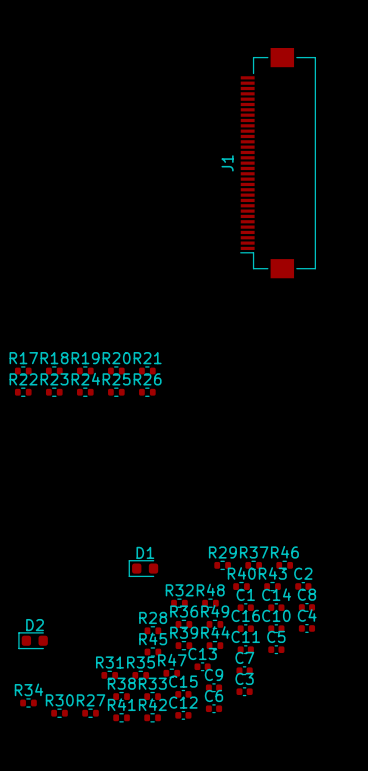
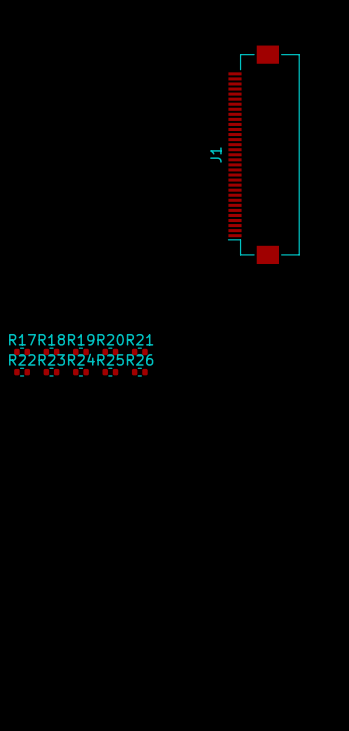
R29: (222, 565) -> none
R37: (253, 565) -> none
R46: (284, 565) -> none
D1: (143, 568) -> none
R40: (241, 586) -> none
R43: (272, 586) -> none
C2: (303, 586) -> none
R32: (179, 603) -> none
R48: (210, 603) -> none
C1: (245, 607) -> none
C14: (276, 607) -> none
C8: (306, 607) -> none
R36: (183, 624) -> none
R49: (214, 624) -> none
C16: (245, 628) -> none
C10: (276, 628) -> none
C4: (306, 628) -> none
R28: (152, 630) -> none
D2: (33, 640) -> none
R39: (183, 645) -> none
R44: (214, 645) -> none
C11: (245, 649) -> none
C5: (276, 649) -> none
R45: (152, 652) -> none
C13: (202, 666) -> none
C7: (244, 670) -> none
R47: (171, 673) -> none
R31: (109, 675) -> none
R35: (140, 675) -> none
C9: (213, 687) -> none
C3: (244, 691) -> none
C15: (183, 694) -> none
R38: (121, 696) -> none
R33: (152, 696) -> none
R34: (28, 702) -> none
C6: (213, 708) -> none
R30: (59, 713) -> none
R27: (90, 713) -> none
C12: (183, 715) -> none
R41: (121, 717) -> none
R42: (152, 717) -> none

